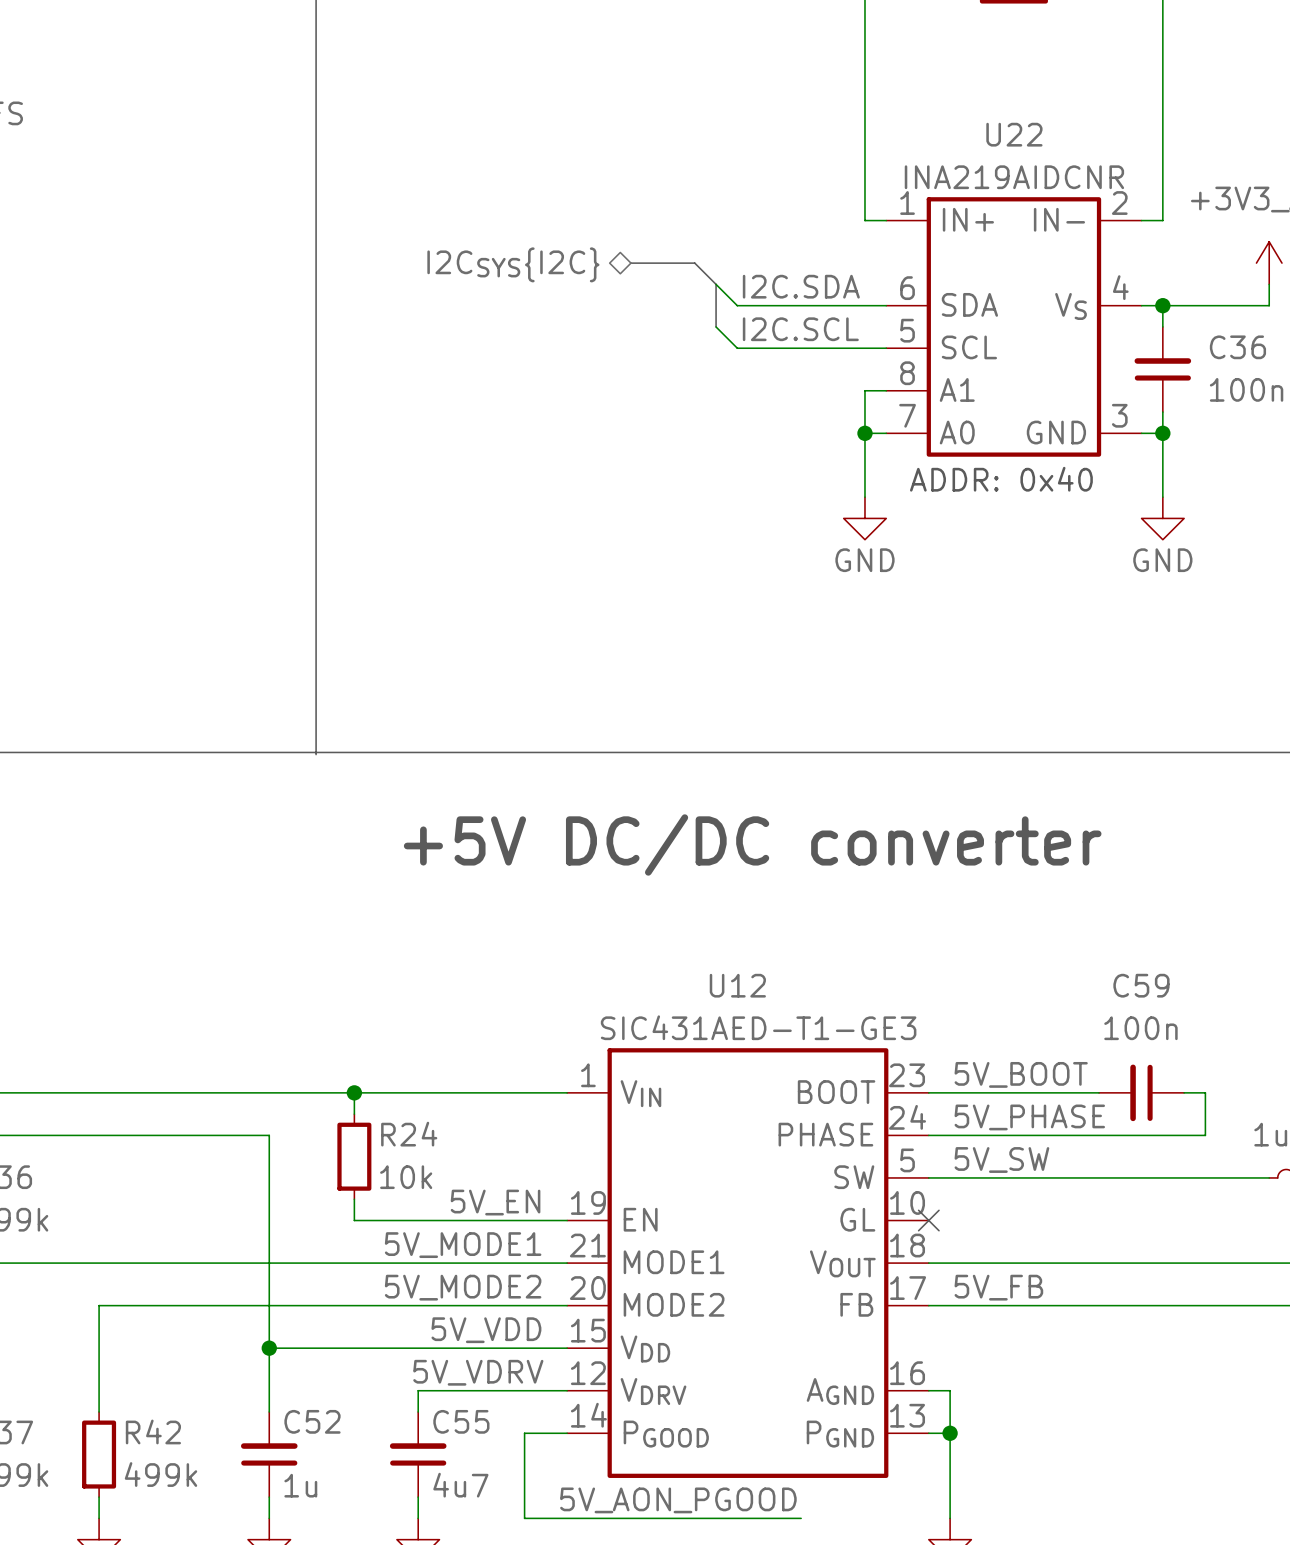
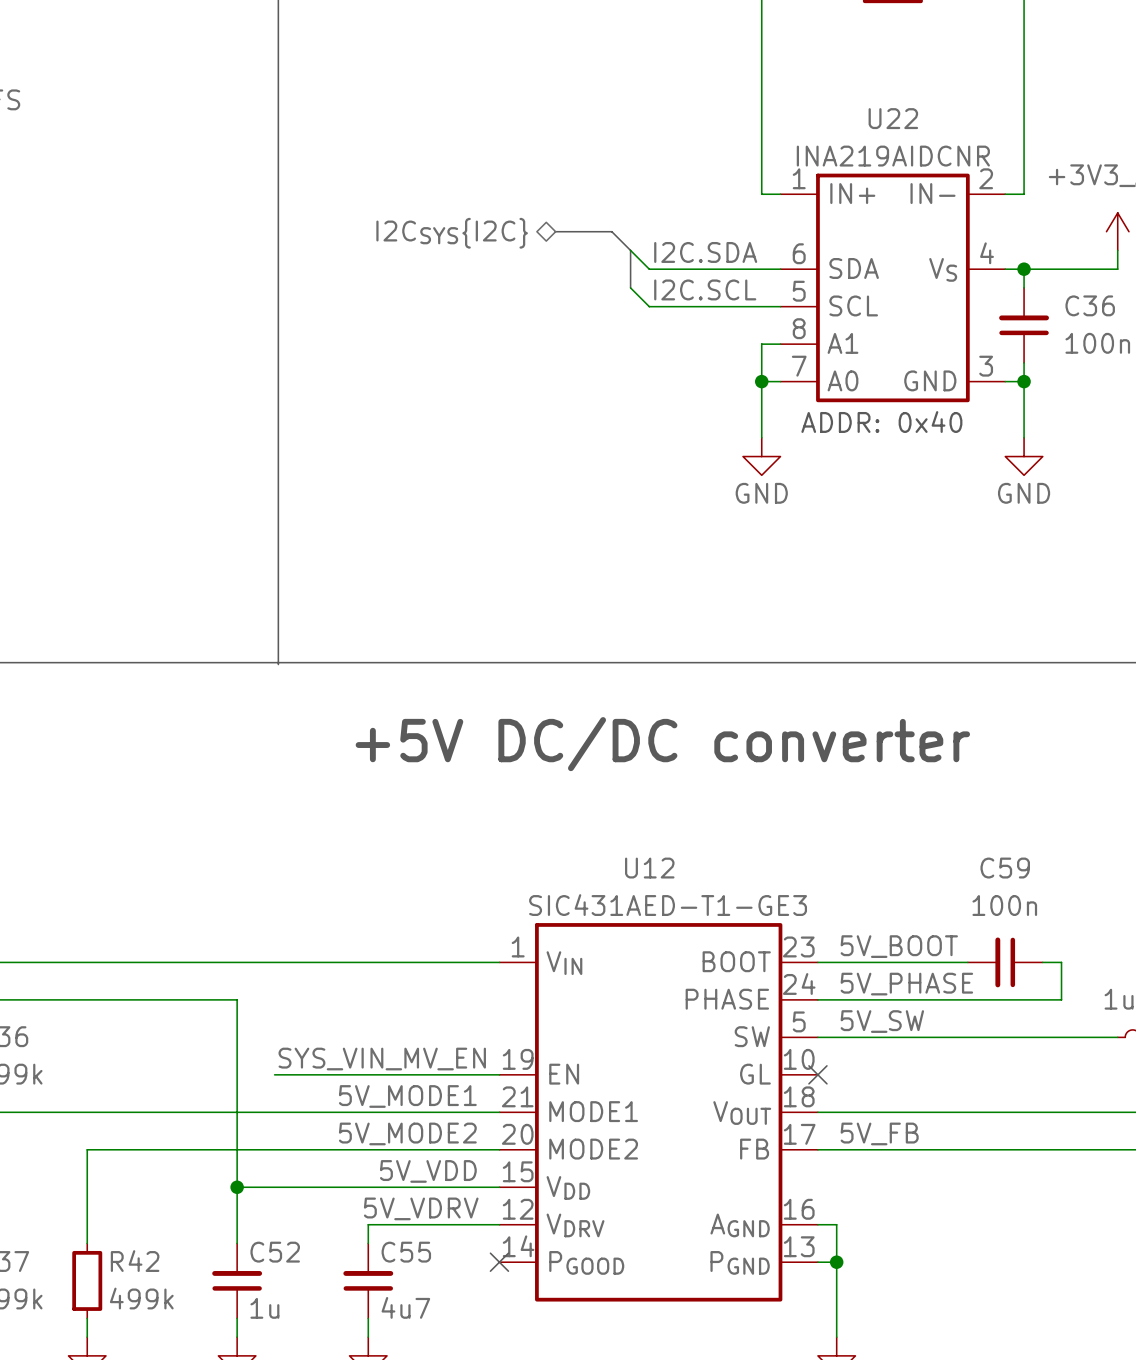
wire: (354, 1092) (354, 1114) -> none
junction: (354, 1092) -> none
R24: (354, 1156) -> none
wire: (354, 1199) (354, 1220) -> (274, 1074) (312, 1074)
label: none -> SYS_VIN_MV_EN (382, 1059)
label: 5V_EN (495, 1202) -> none
wire: (567, 1433) (524, 1433) (524, 1518) (801, 1518) -> none
no-connect mark: none -> (499, 1262)
label: 5V_AON_PGOOD (678, 1500) -> none

